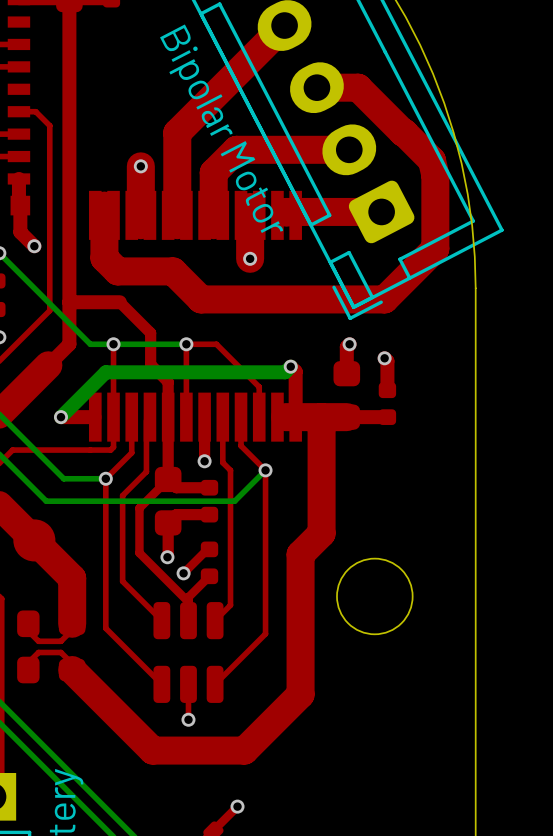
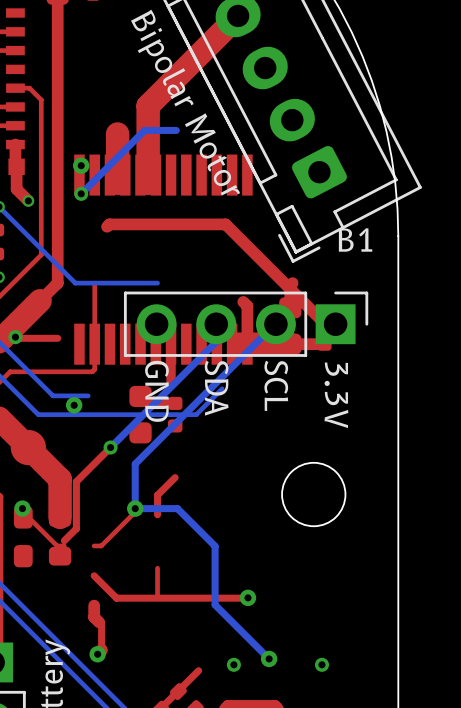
top track: (316, 87) (358, 87) (431, 160) (435, 175) (435, 248) (384, 299) (201, 299) (173, 271) (117, 271) (104, 258) (104, 205) -> none
top track: (349, 149) (236, 149) (213, 172) (213, 225) -> none
bottom track: none -> (176, 130) (144, 130) (81, 193)
via: (140, 166) -> none
via: none -> (81, 165)
top track: (250, 206) (250, 258) -> none
top track: (381, 211) (286, 212) -> none
via: none -> (81, 193)
via: (250, 258) -> none
top track: none -> (107, 226) (109, 224) (225, 224) (325, 324) (335, 324)
text: none -> B1 (355, 239)
top track: (69, 302) (119, 302) (150, 333) (150, 364) (168, 382) (168, 479) (139, 508) (139, 552) (188, 602) -> none
via: (113, 344) -> none
via: (186, 344) -> none
via: (349, 344) -> none
top track: (384, 358) (387, 361) (387, 390) -> none
via: (384, 358) -> none
bottom track: (290, 366) (285, 372) (105, 372) (60, 417) -> none
via: (290, 366) -> none
part: none -> (246, 324)
bottom track: none -> (274, 324) (135, 463) (135, 508) (177, 508) (215, 546) (215, 604) (269, 658)
bottom track: none -> (222, 335) (110, 447)
top track: none -> (15, 337) (57, 338)
via: none -> (15, 337)
via: (60, 417) -> none
top track: (94, 417) (60, 417) -> none
top track: (131, 417) (131, 452) (105, 478) (105, 628) (161, 684) -> none
top track: (222, 417) (222, 462) (230, 470) (230, 605) (215, 620) -> none
top track: (241, 417) (241, 445) (265, 470) (265, 633) (215, 684) -> none
top track: (259, 417) (259, 387) (216, 344) (186, 344) (186, 417) -> none
top track: (321, 417) (321, 533) (300, 554) (300, 694) (244, 750) (152, 750) (72, 670) -> none
top track: (146, 420) (146, 471) (122, 495) (122, 581) (161, 620) -> none
via: (204, 461) -> none
via: (265, 470) -> none
text: none -> SCL (276, 385)
text: none -> SDA (216, 388)
text: none -> GND (156, 391)
text: none -> 3.3V (336, 395)
via position: (105, 478) -> (74, 405)
top track: (209, 514) (176, 514) (168, 522) (167, 557) -> none
top track: none -> (110, 447) (76, 481) (76, 528) (64, 540)
via: none -> (110, 447)
top track: (209, 549) (183, 573) -> none
via: (167, 557) -> none
part: (209, 562) -> none
via: (183, 573) -> none
top track: none -> (22, 508) (22, 511) (57, 545) (64, 545)
via: none -> (22, 508)
top track: none -> (135, 508) (135, 512) (101, 545) (94, 545)
via: none -> (135, 508)
top track: (72, 630) (60, 641) (38, 641) (28, 631) -> none
part: (188, 652) -> none
top track: (28, 662) (38, 652) (60, 652) (72, 663) -> none
top track: none -> (94, 575) (116, 598) (247, 598)
via: (188, 719) -> none
via: none -> (247, 597)
top track: none -> (94, 605) (94, 617) (101, 624) (101, 650) (97, 654)
via: none -> (97, 654)
via: none -> (269, 658)
via: none -> (233, 664)
via: none -> (321, 664)
via: (237, 806) -> none

